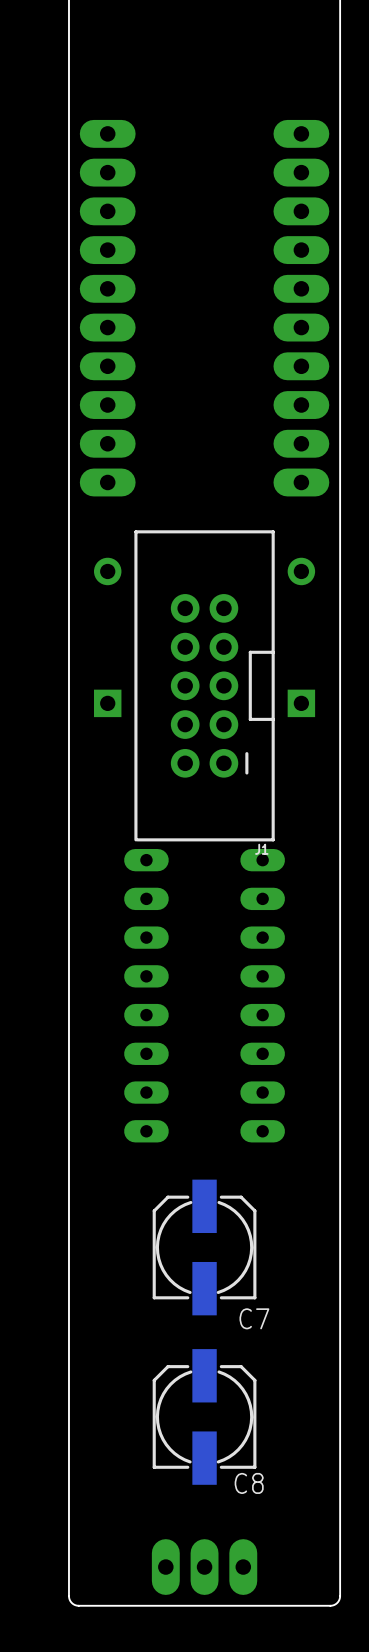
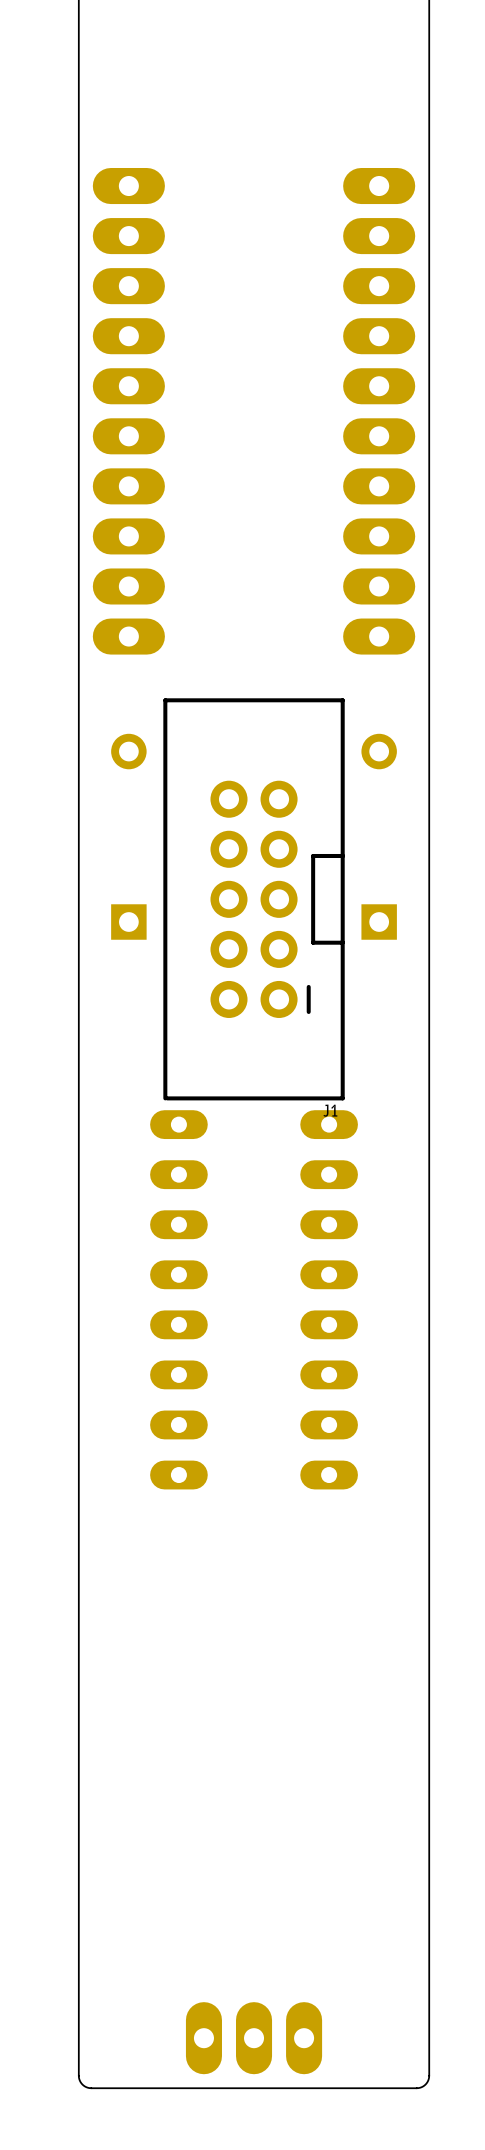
C7: (204, 1247) -> none
C8: (204, 1416) -> none

